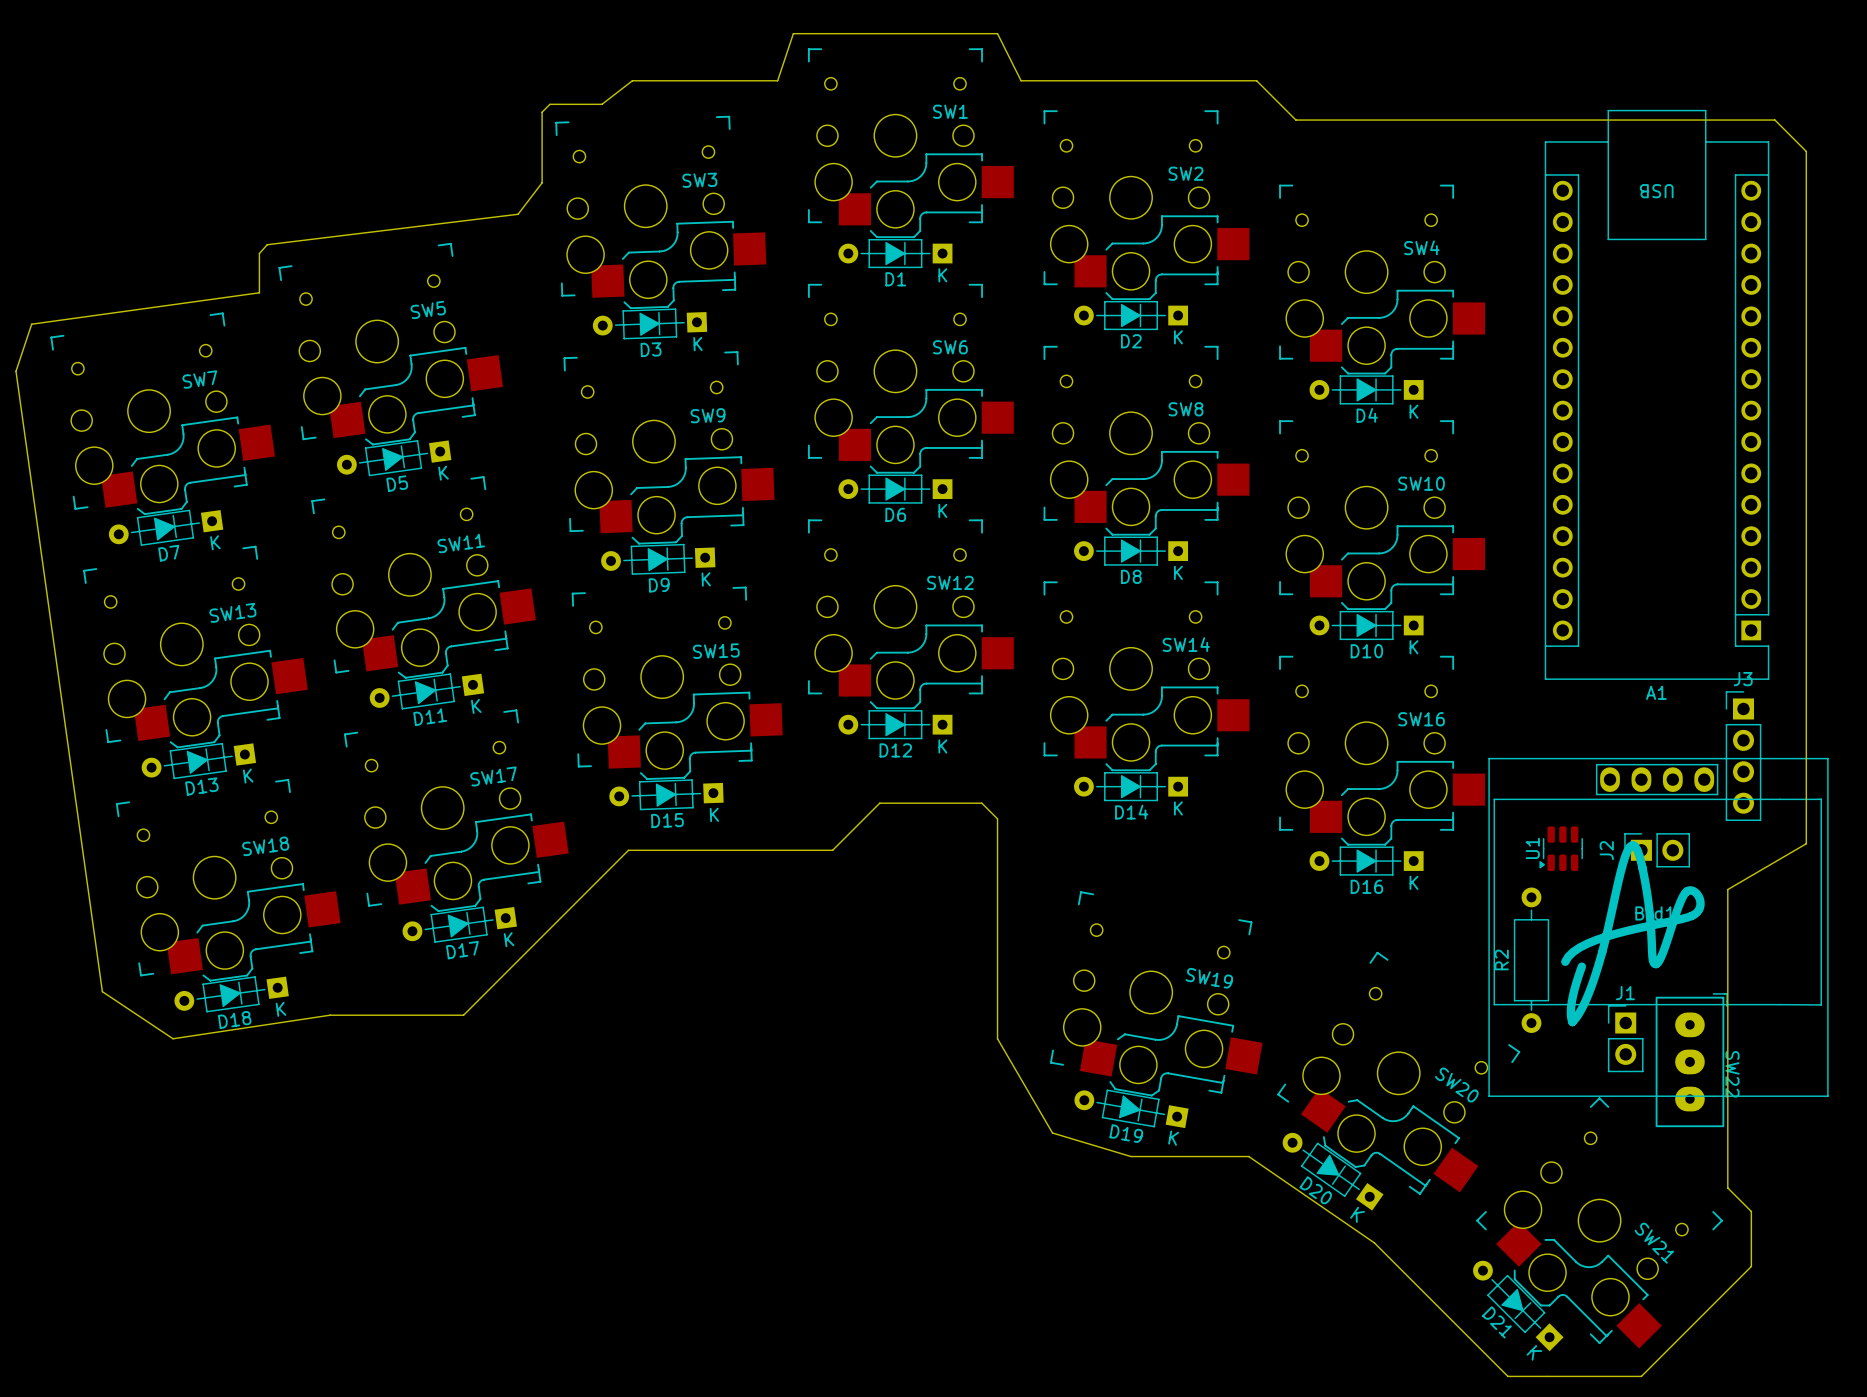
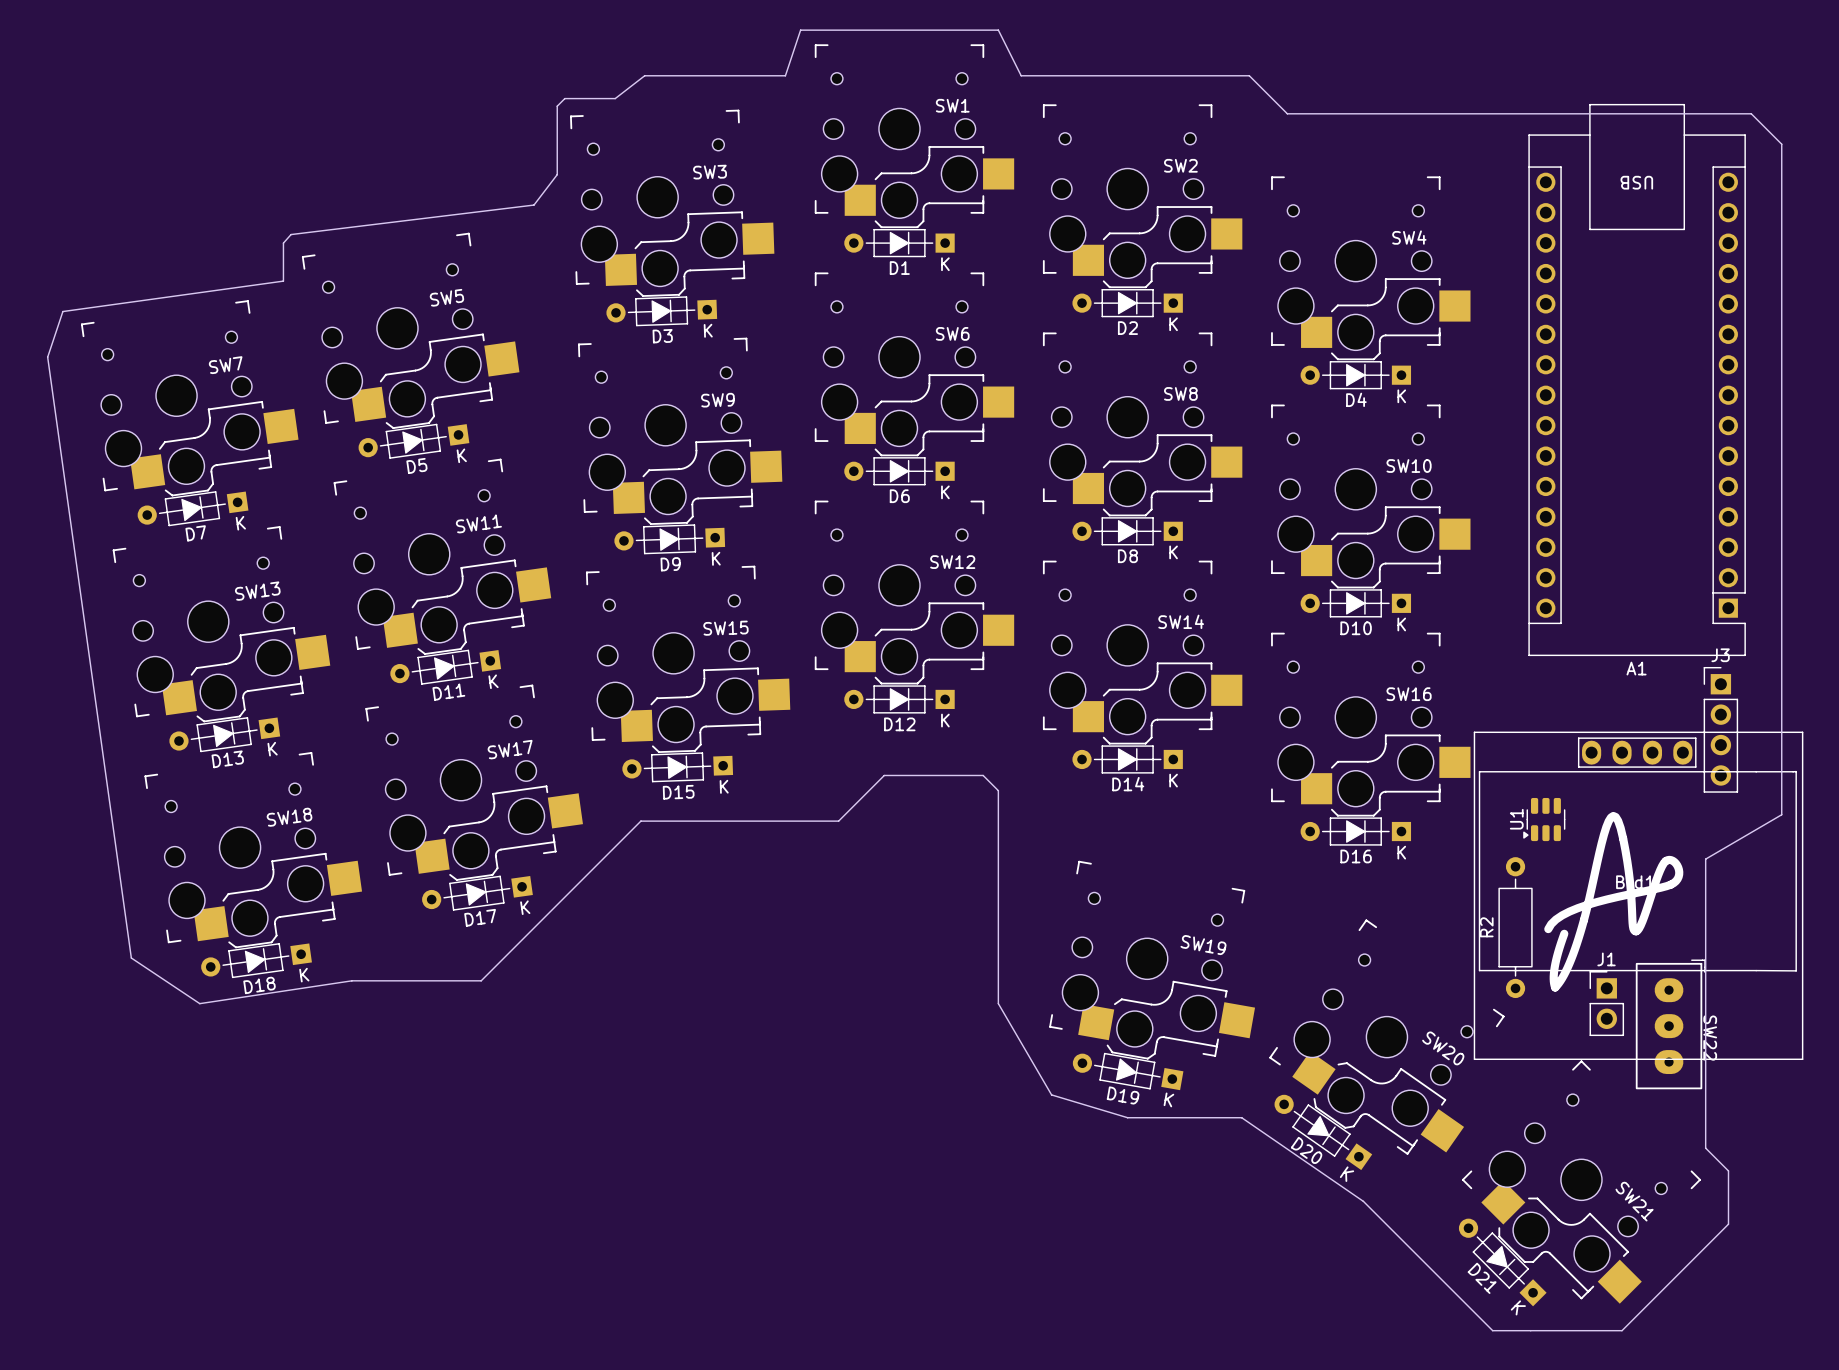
J2: (1657, 850) -> none

